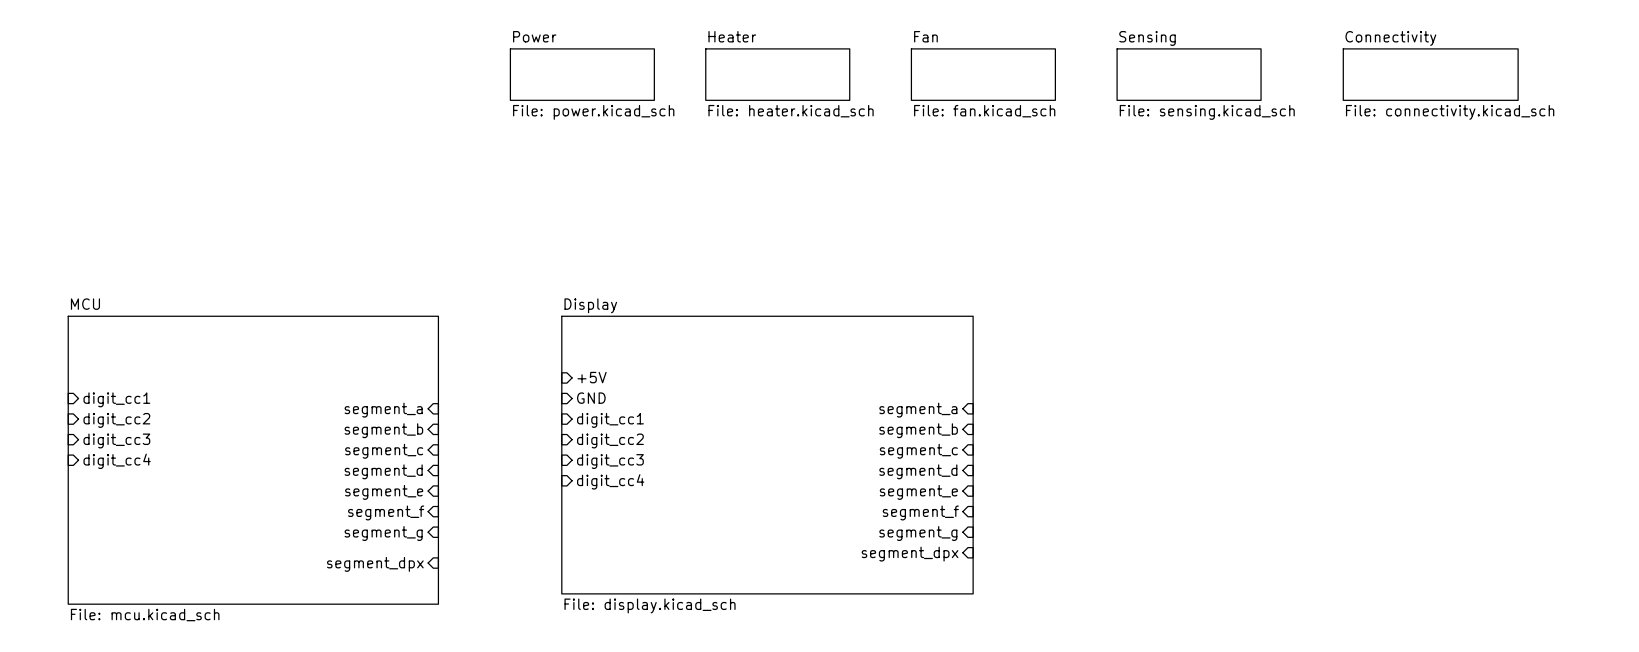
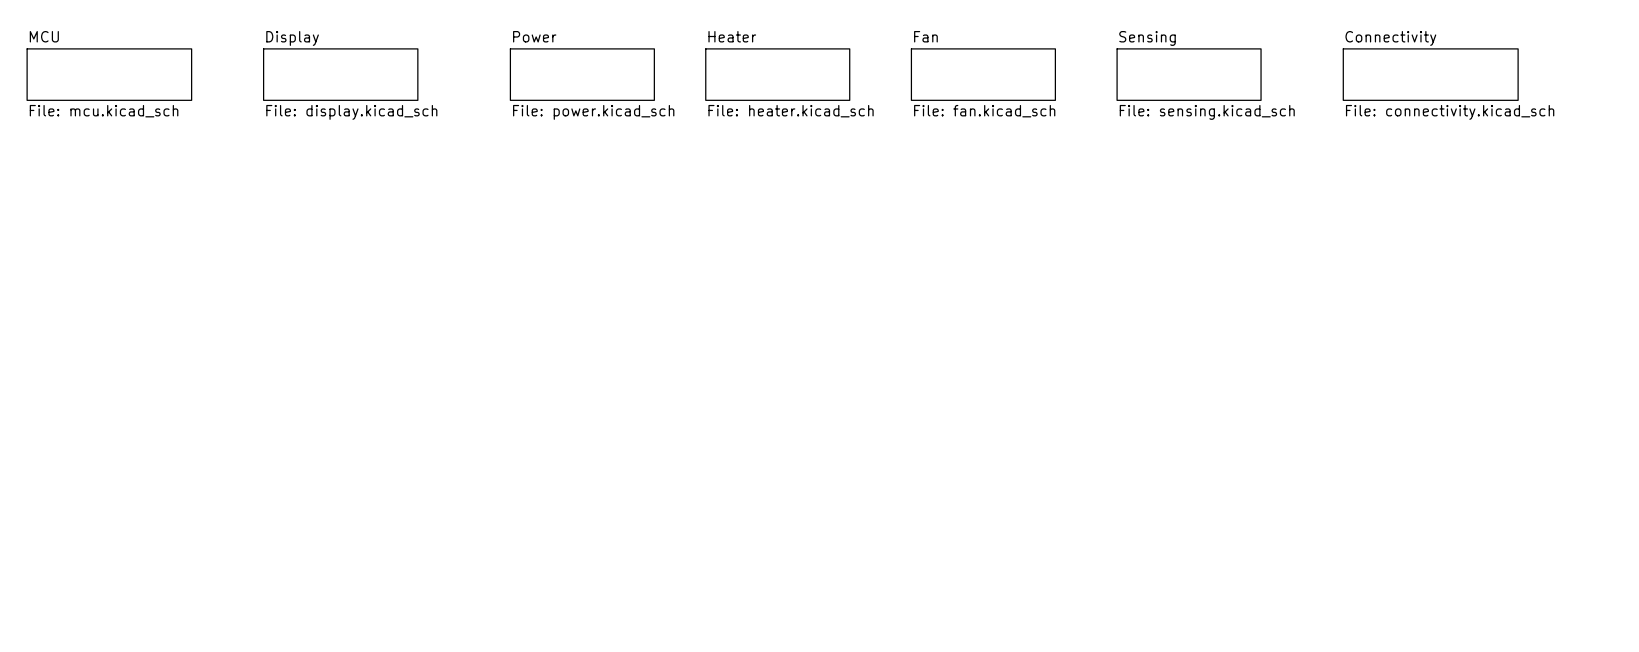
sheet MCU: none -> File: mcu.kicad_sch (109, 74)
sheet Display: none -> File: display.kicad_sch (340, 74)
sheet pin: +5V (592, 377) -> none
sheet pin: GND (591, 398) -> none
sheet pin: digit_cc1 (116, 399) -> none
sheet pin: segment_a (383, 410) -> none
sheet pin: segment_a (918, 410) -> none
sheet pin: digit_cc2 (116, 420) -> none
sheet pin: digit_cc1 (610, 420) -> none
sheet pin: segment_b (383, 430) -> none
sheet pin: segment_b (918, 430) -> none
sheet pin: digit_cc3 (116, 440) -> none
sheet pin: digit_cc2 (610, 440) -> none
sheet pin: segment_c (384, 451) -> none
sheet pin: segment_c (918, 451) -> none
sheet Display: File: display.kicad_sch (767, 455) -> none
sheet MCU: File: mcu.kicad_sch (253, 460) -> none
sheet pin: digit_cc4 (117, 461) -> none
sheet pin: digit_cc3 (610, 461) -> none
sheet pin: segment_d (383, 471) -> none
sheet pin: segment_d (918, 471) -> none
sheet pin: digit_cc4 (610, 481) -> none
sheet pin: segment_e (384, 492) -> none
sheet pin: segment_e (918, 492) -> none
sheet pin: segment_f (386, 512) -> none
sheet pin: segment_f (920, 512) -> none
sheet pin: segment_g (383, 533) -> none
sheet pin: segment_g (918, 533) -> none
sheet pin: segment_dpx (910, 554) -> none
sheet pin: segment_dpx (375, 564) -> none

